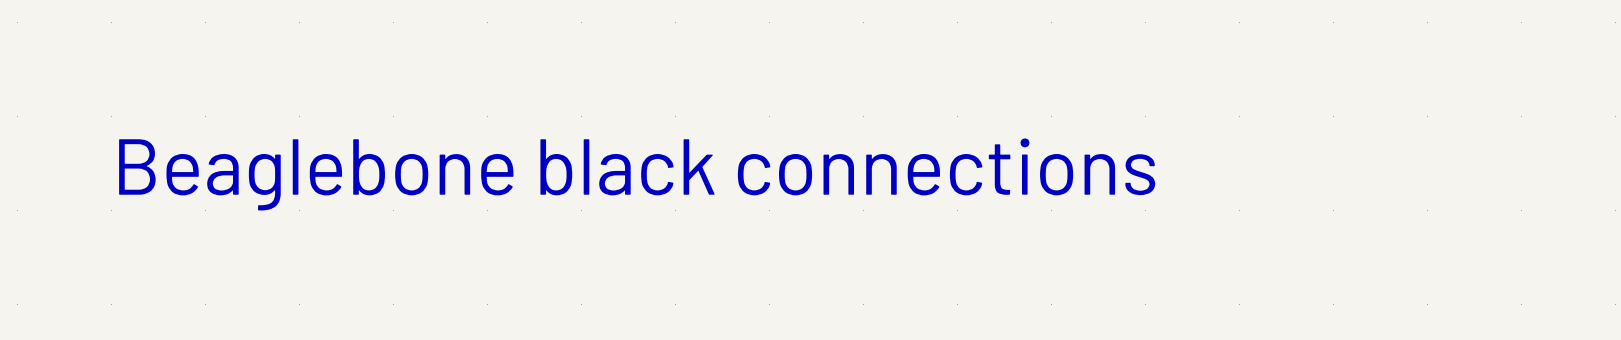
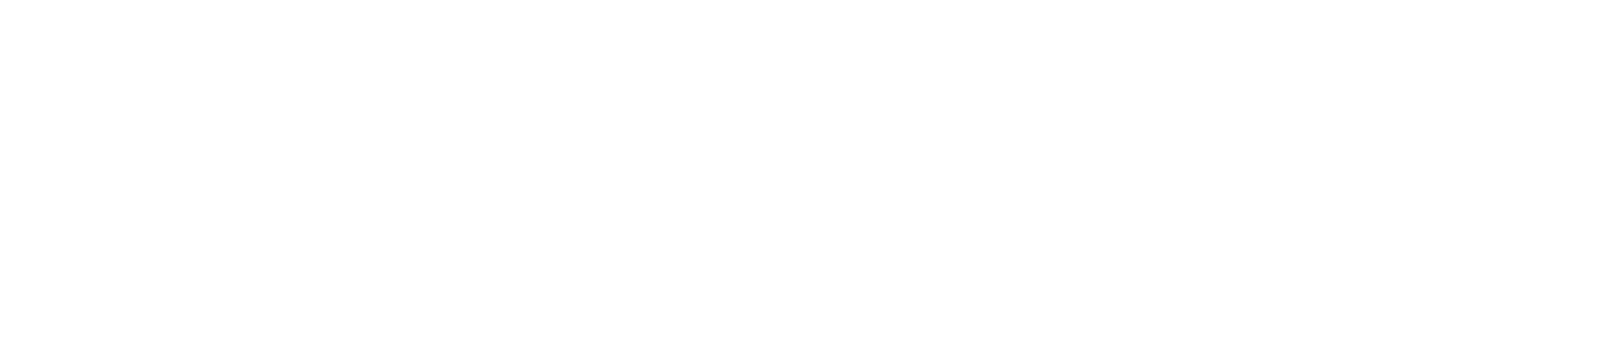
text: Beaglebone black connections (637, 174) -> none

